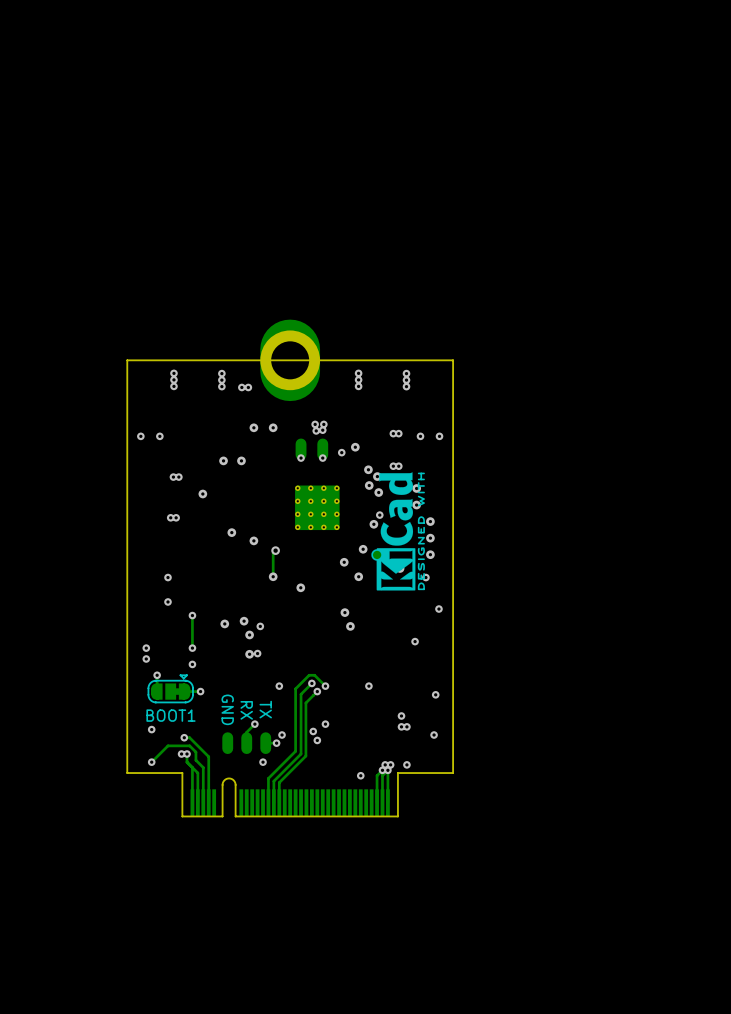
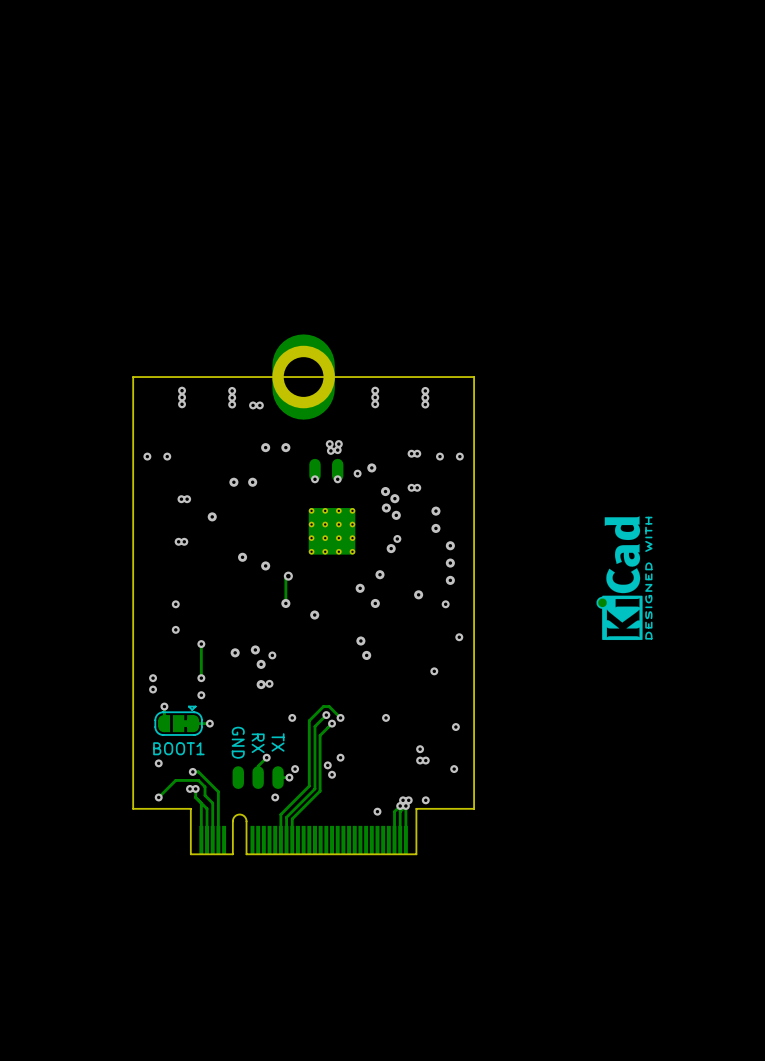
part position: (393, 531) -> (619, 578)

